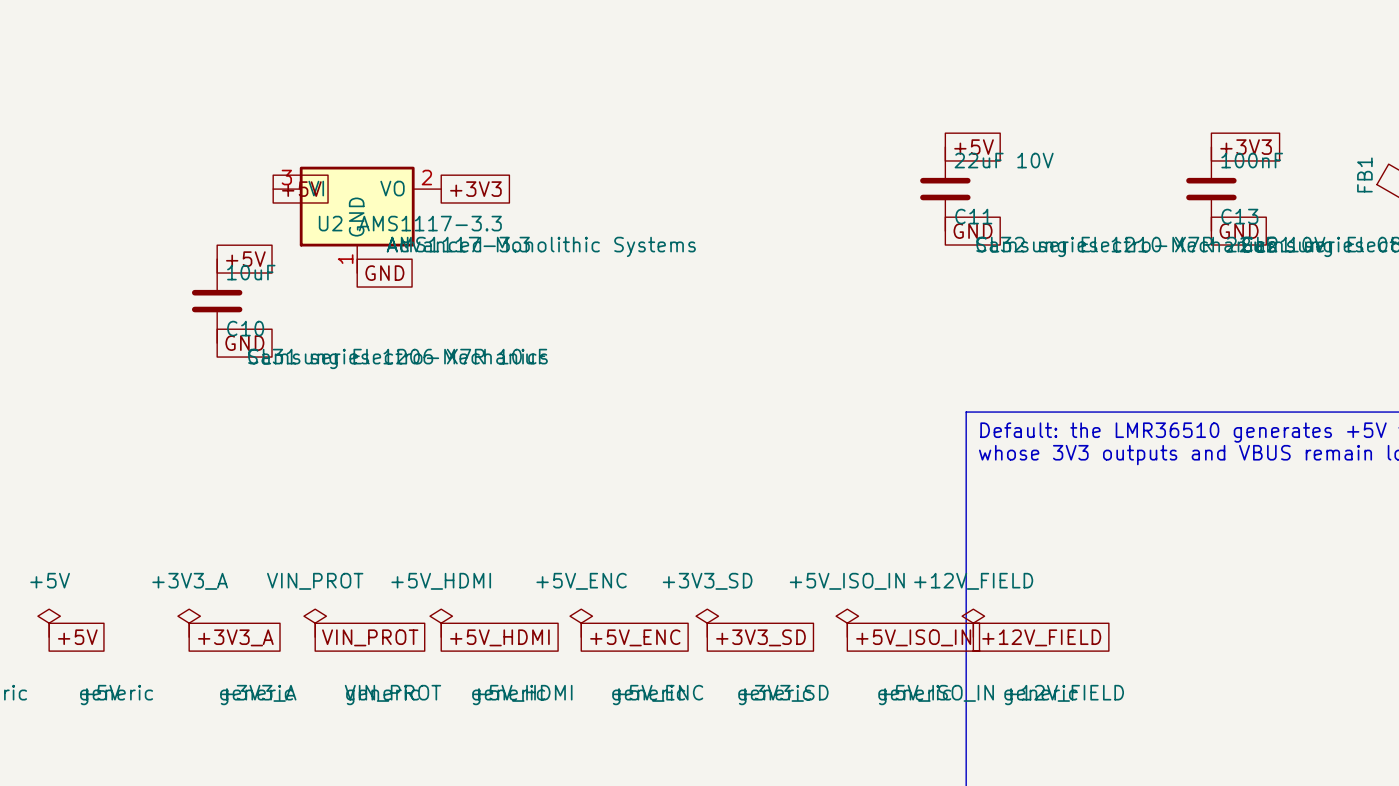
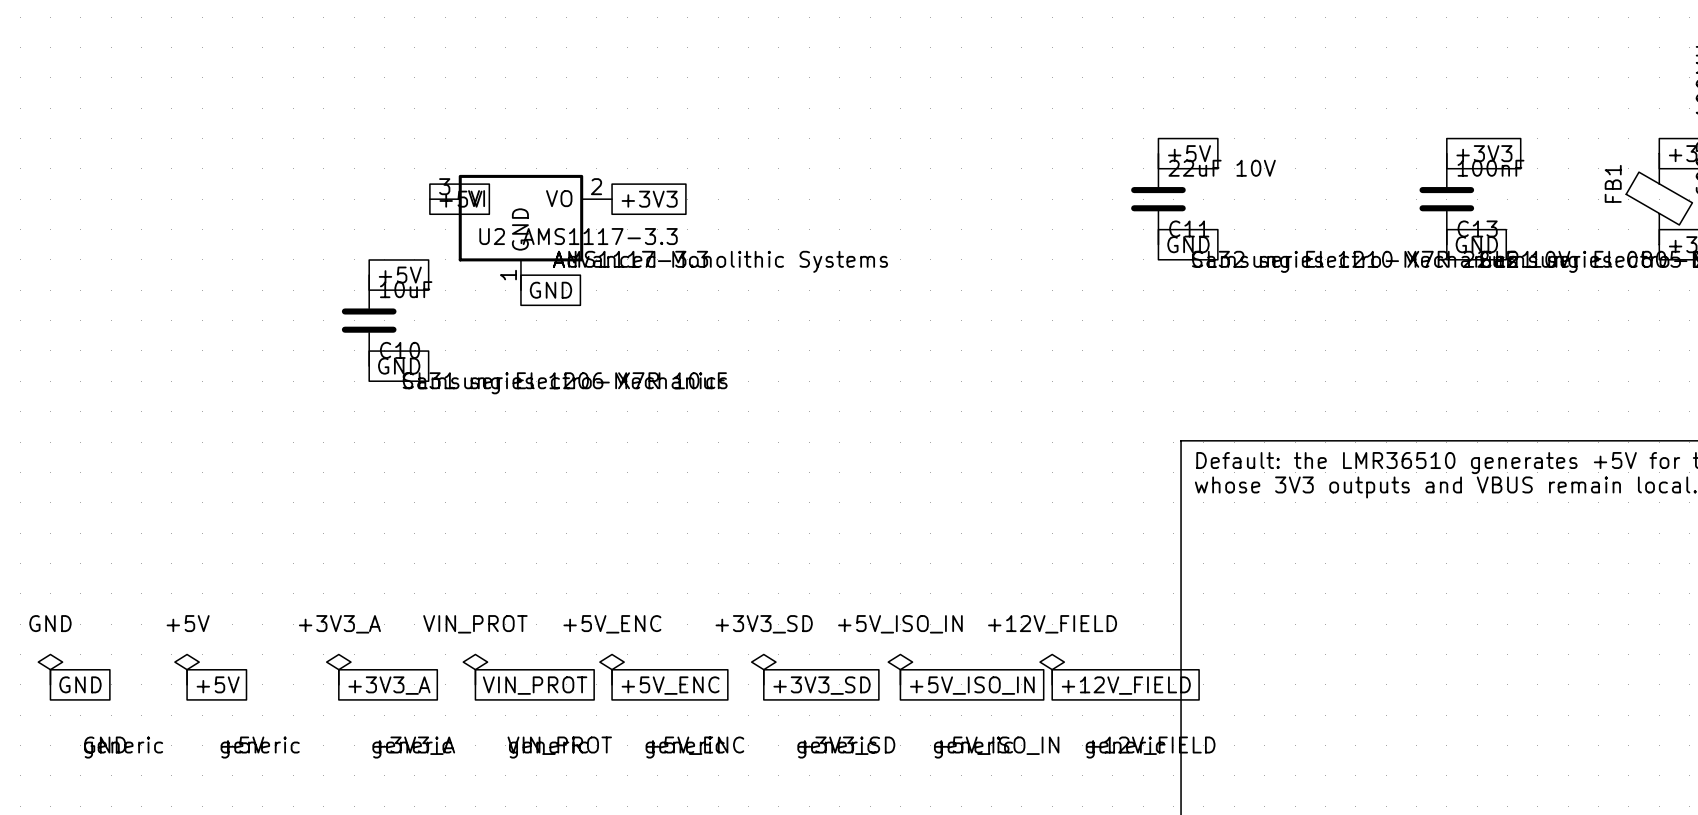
power symbol: +5V_HDMI (441, 623) -> +5V_ENC (612, 669)
power symbol: +5V_ENC (581, 623) -> +3V3_SD (763, 669)
power symbol: +3V3_SD (707, 623) -> +5V_ISO_IN (900, 669)
power symbol: +5V_ISO_IN (847, 623) -> +12V_FIELD (1052, 669)
power symbol: +12V_FIELD (973, 623) -> none
global label: +5V_HDMI (499, 637) -> +5V_ENC (670, 685)
global label: +5V_ENC (635, 637) -> +3V3_SD (822, 685)
global label: +3V3_SD (760, 637) -> +5V_ISO_IN (972, 685)
global label: +5V_ISO_IN (913, 637) -> +12V_FIELD (1126, 685)
global label: +12V_FIELD (1041, 637) -> none

